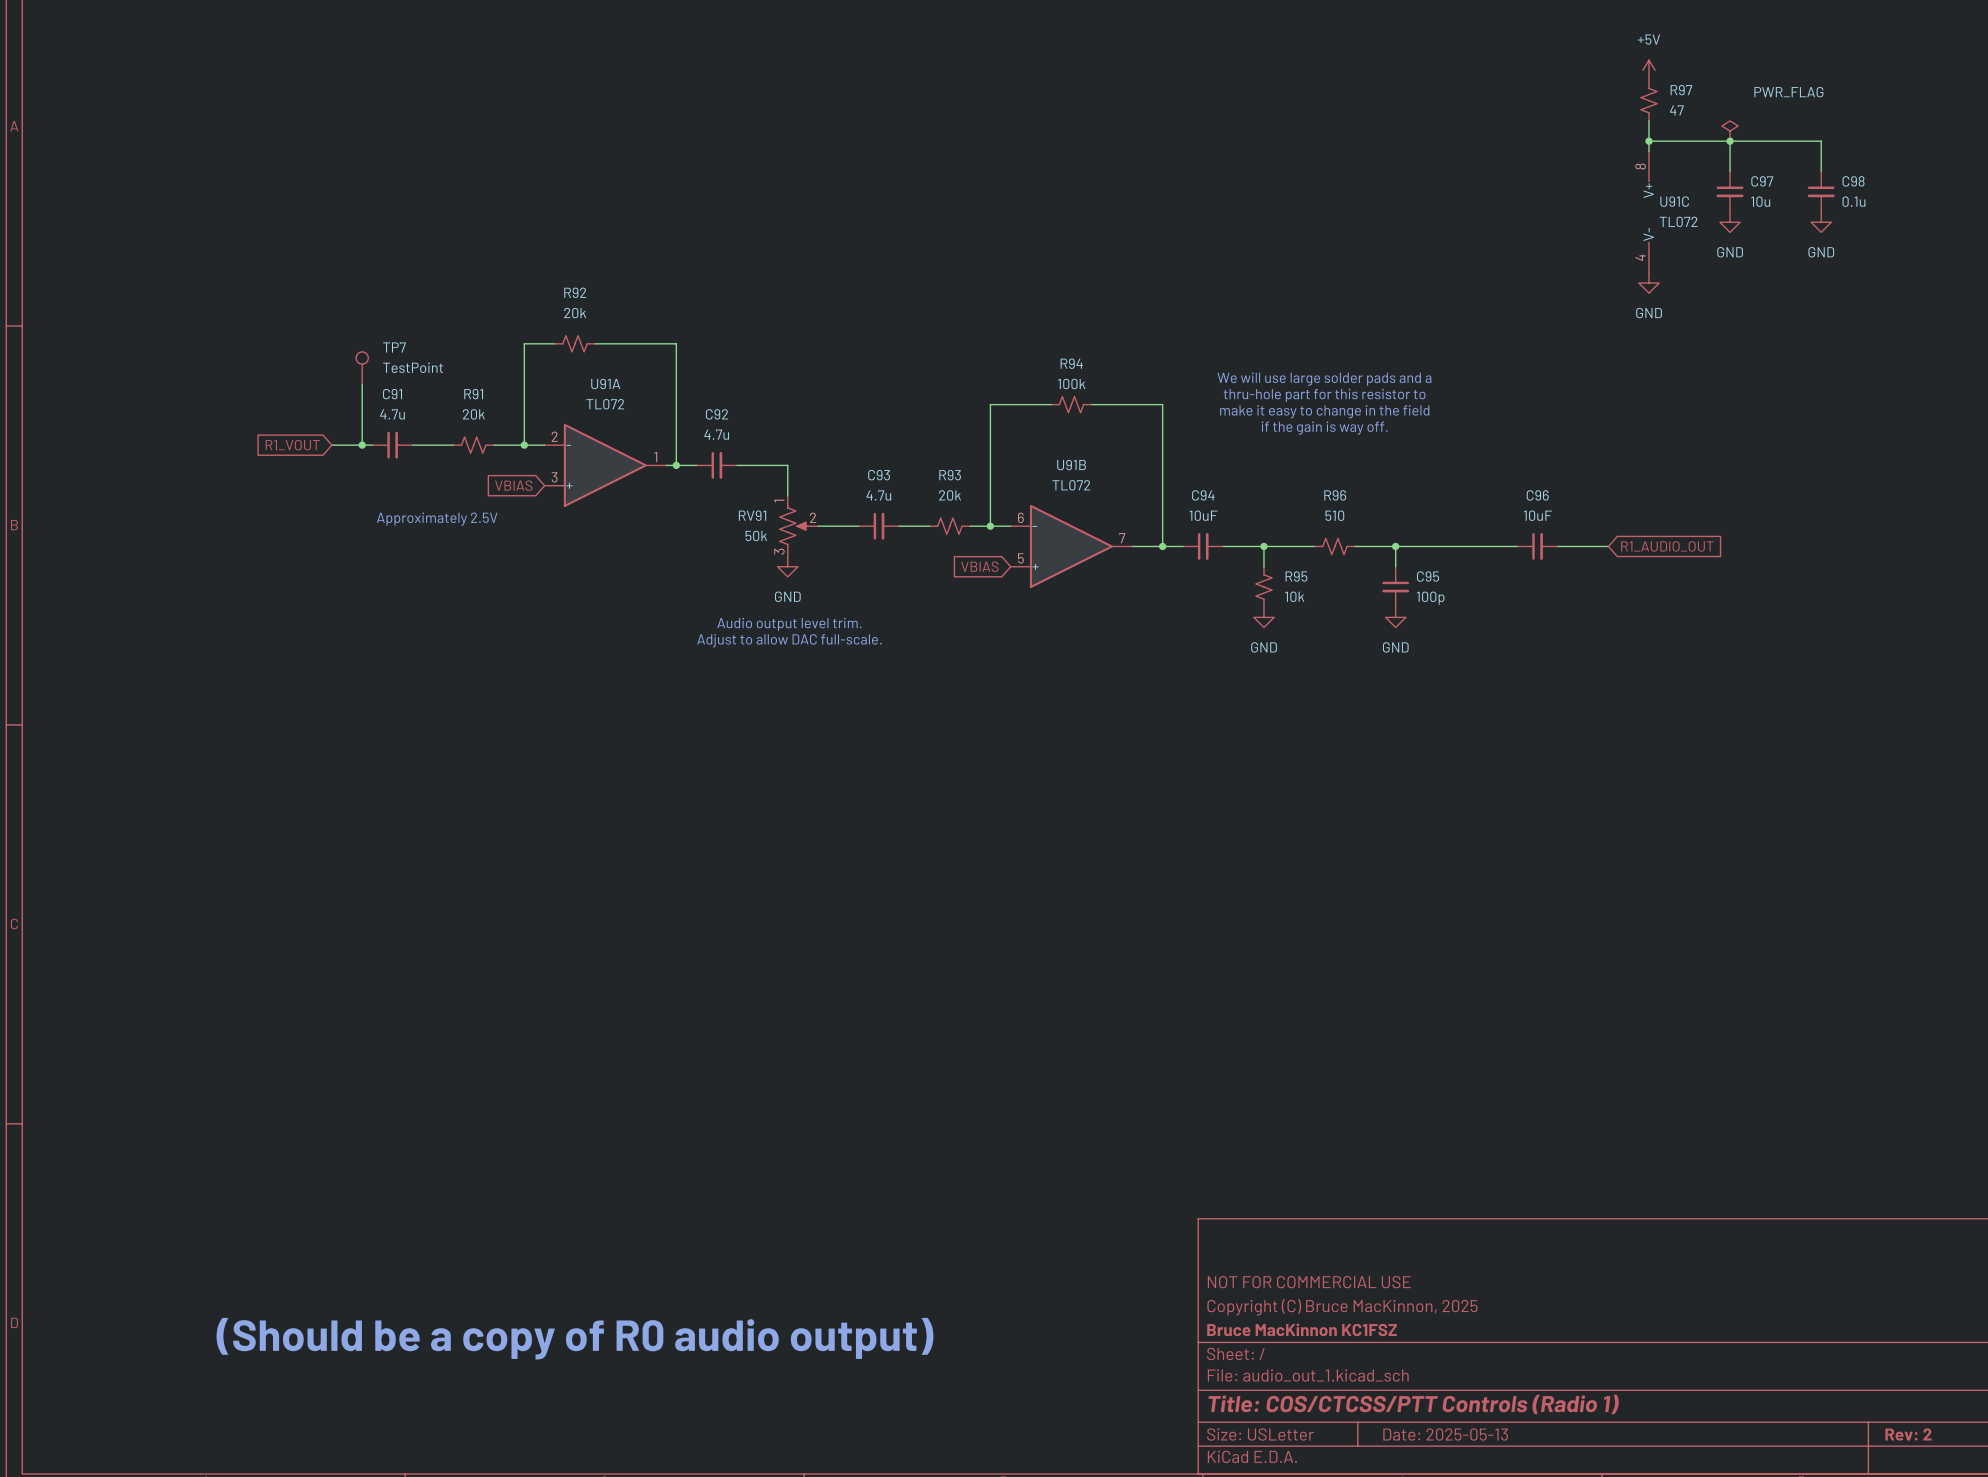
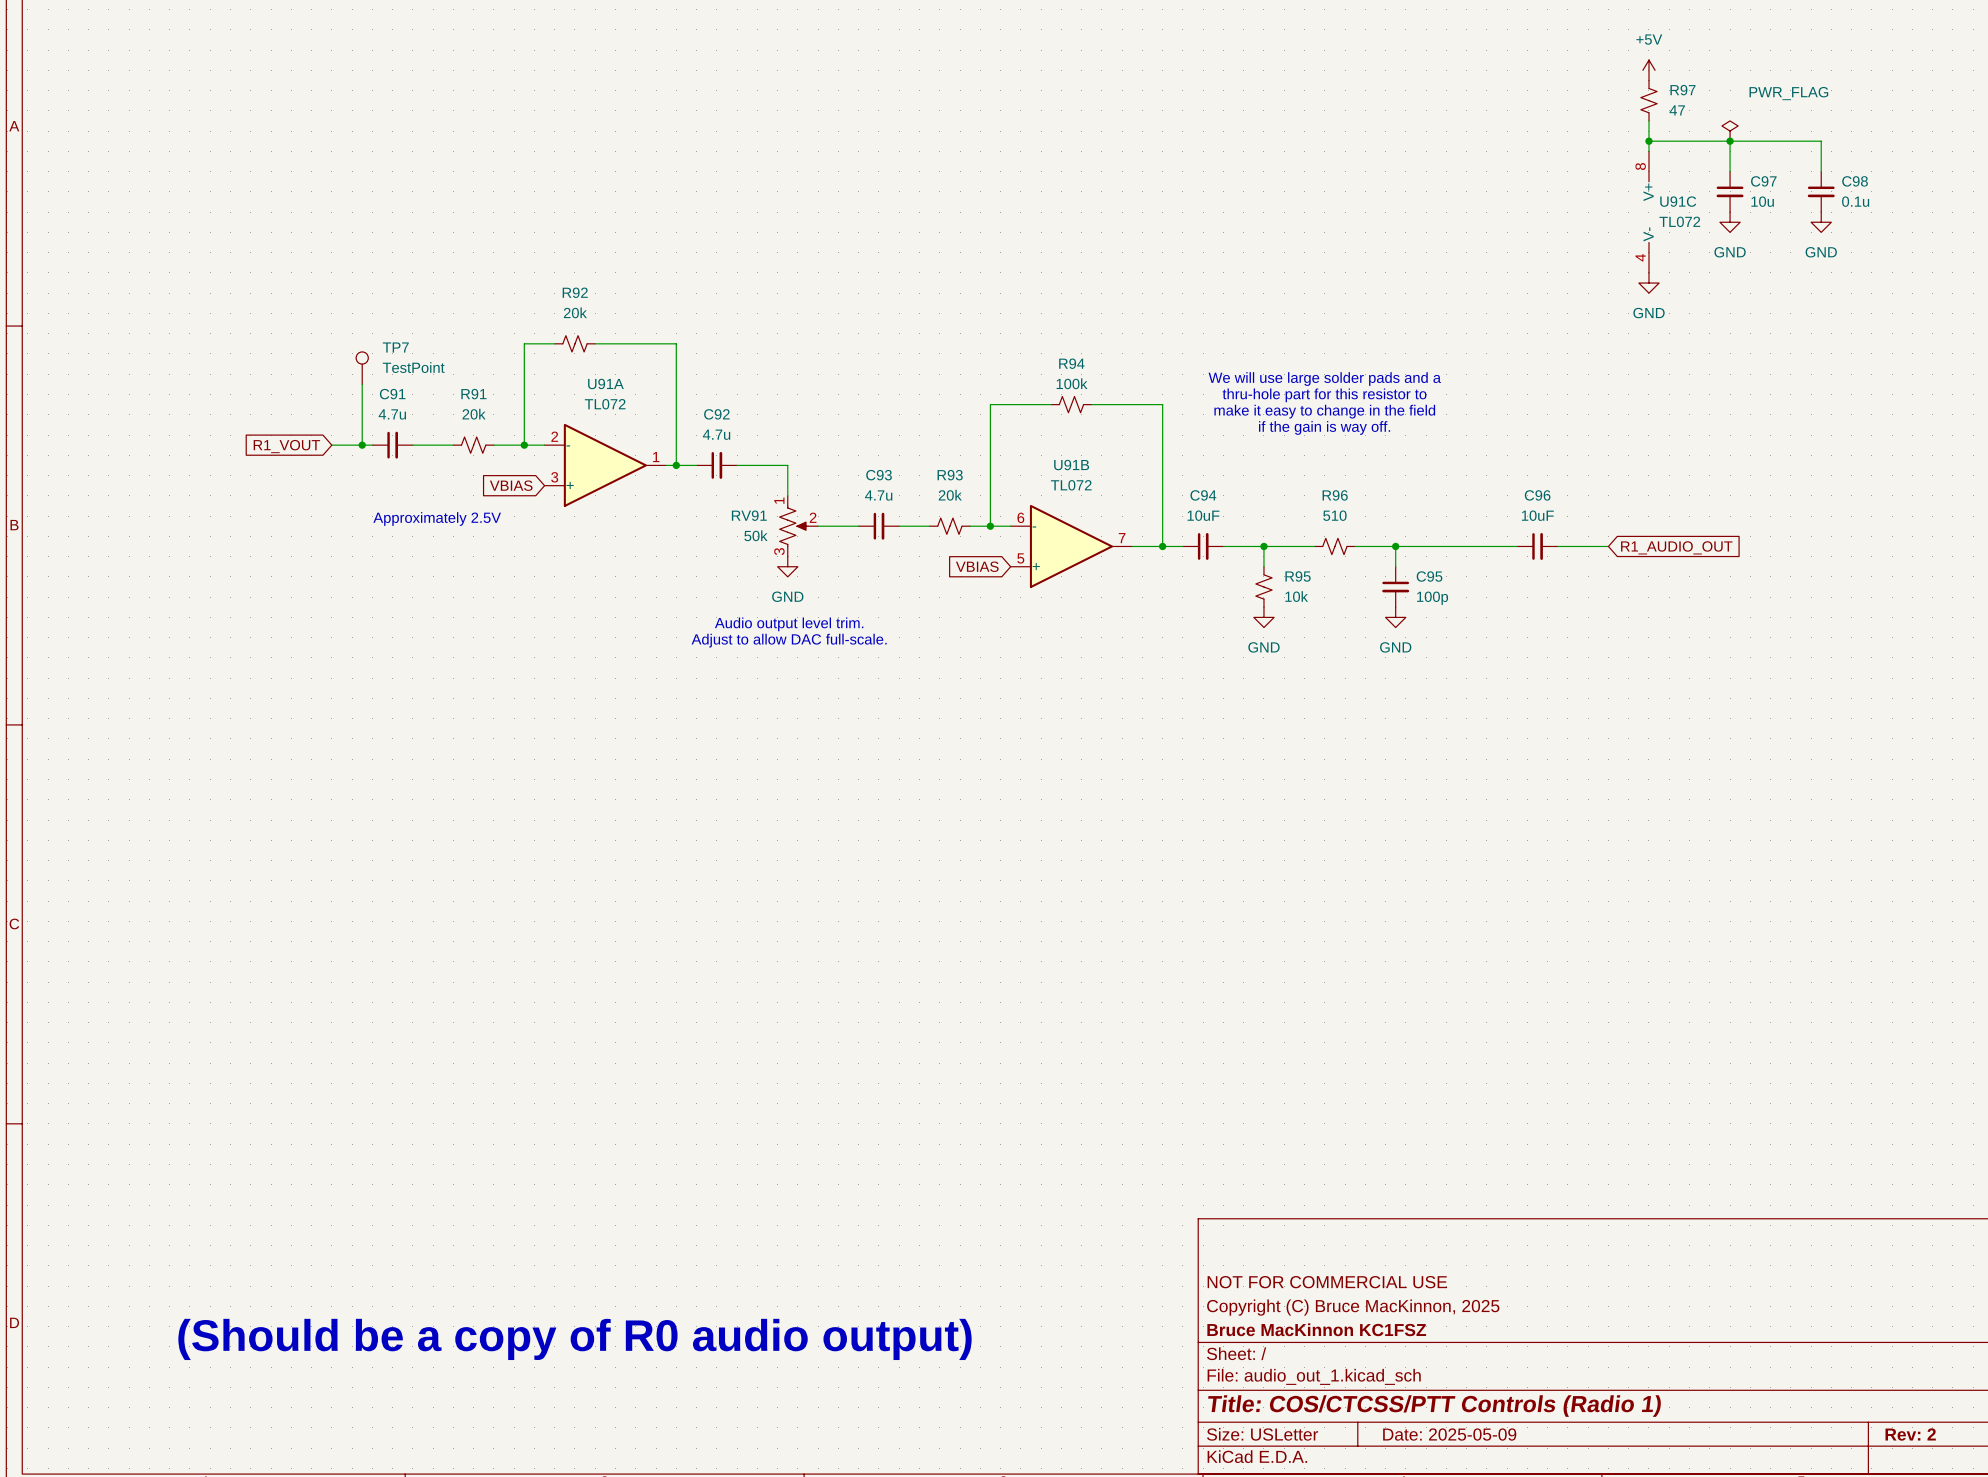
title block: Date: 2025-05-13 (1445, 1434) -> Date: 2025-05-09 (1449, 1434)

